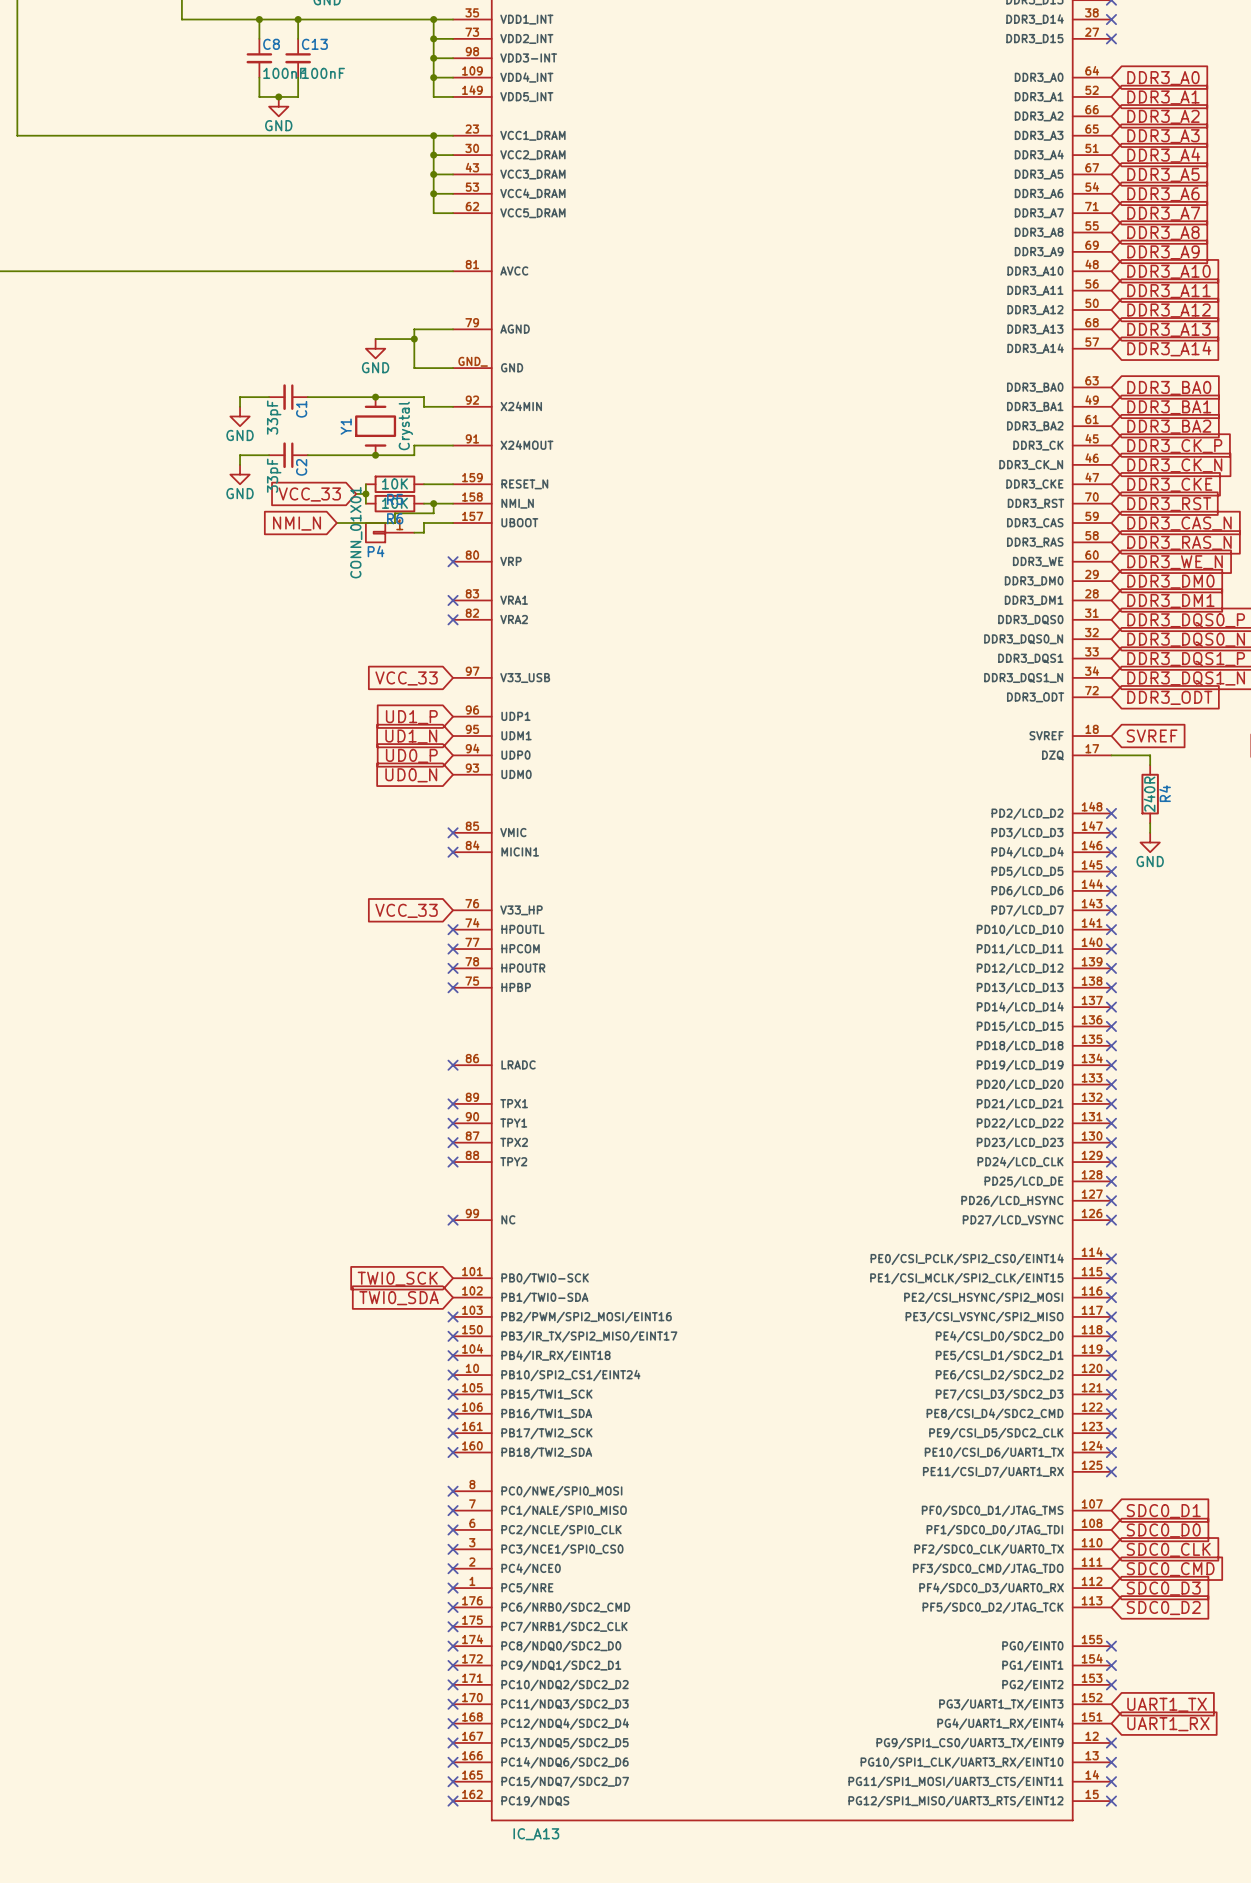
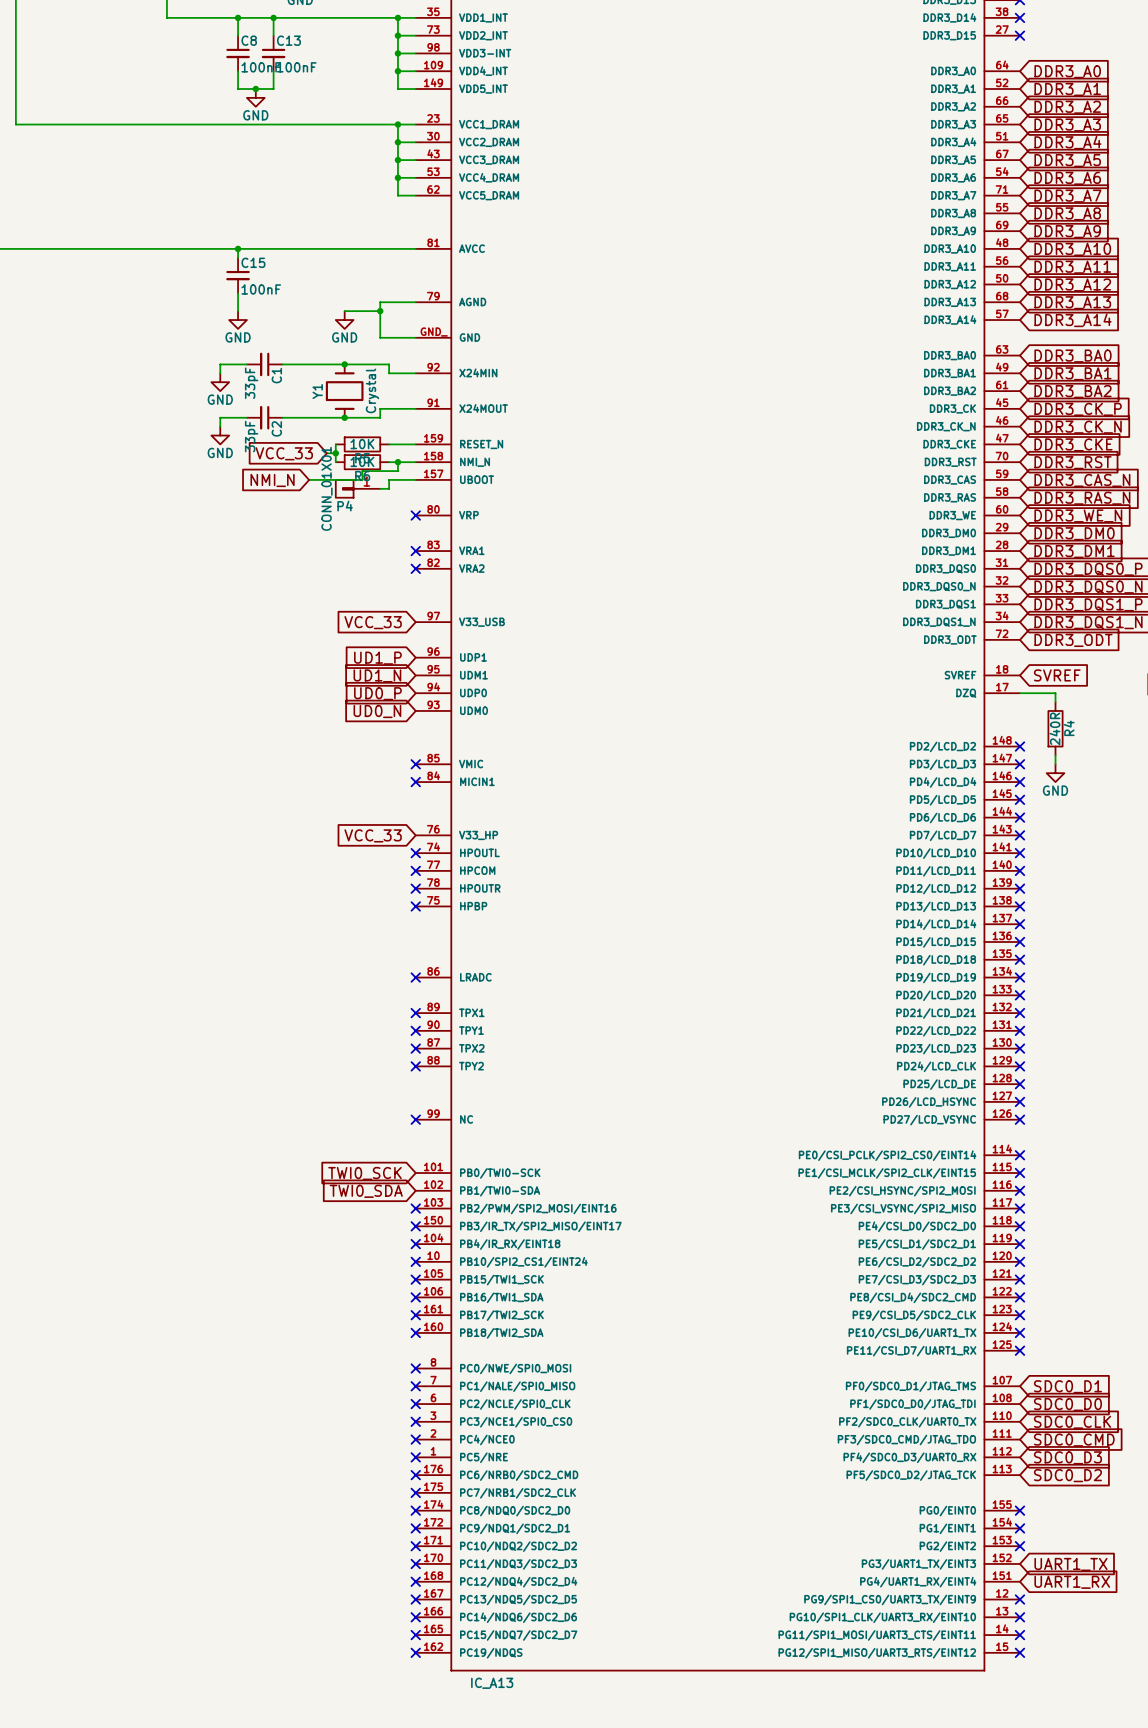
wire: none -> (238, 248) (238, 257)
junction: none -> (238, 248)
C15: none -> 100nF (238, 275)
wire: none -> (238, 293) (238, 311)
power symbol: none -> GND (238, 320)

